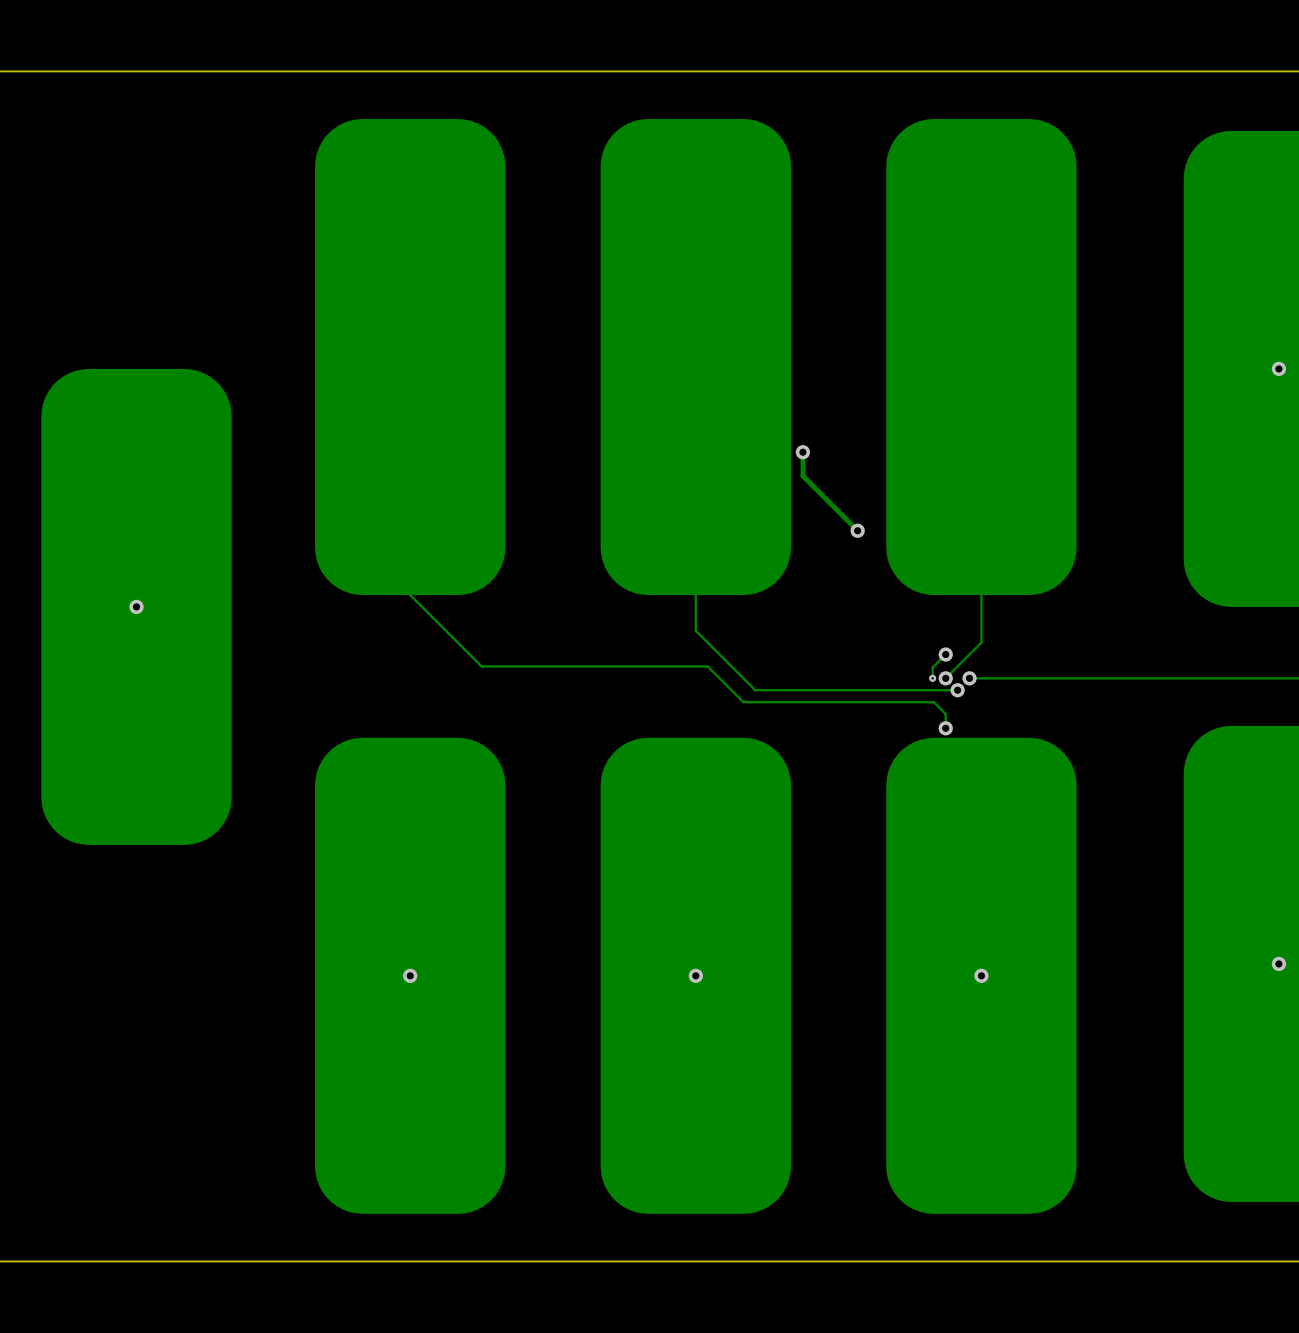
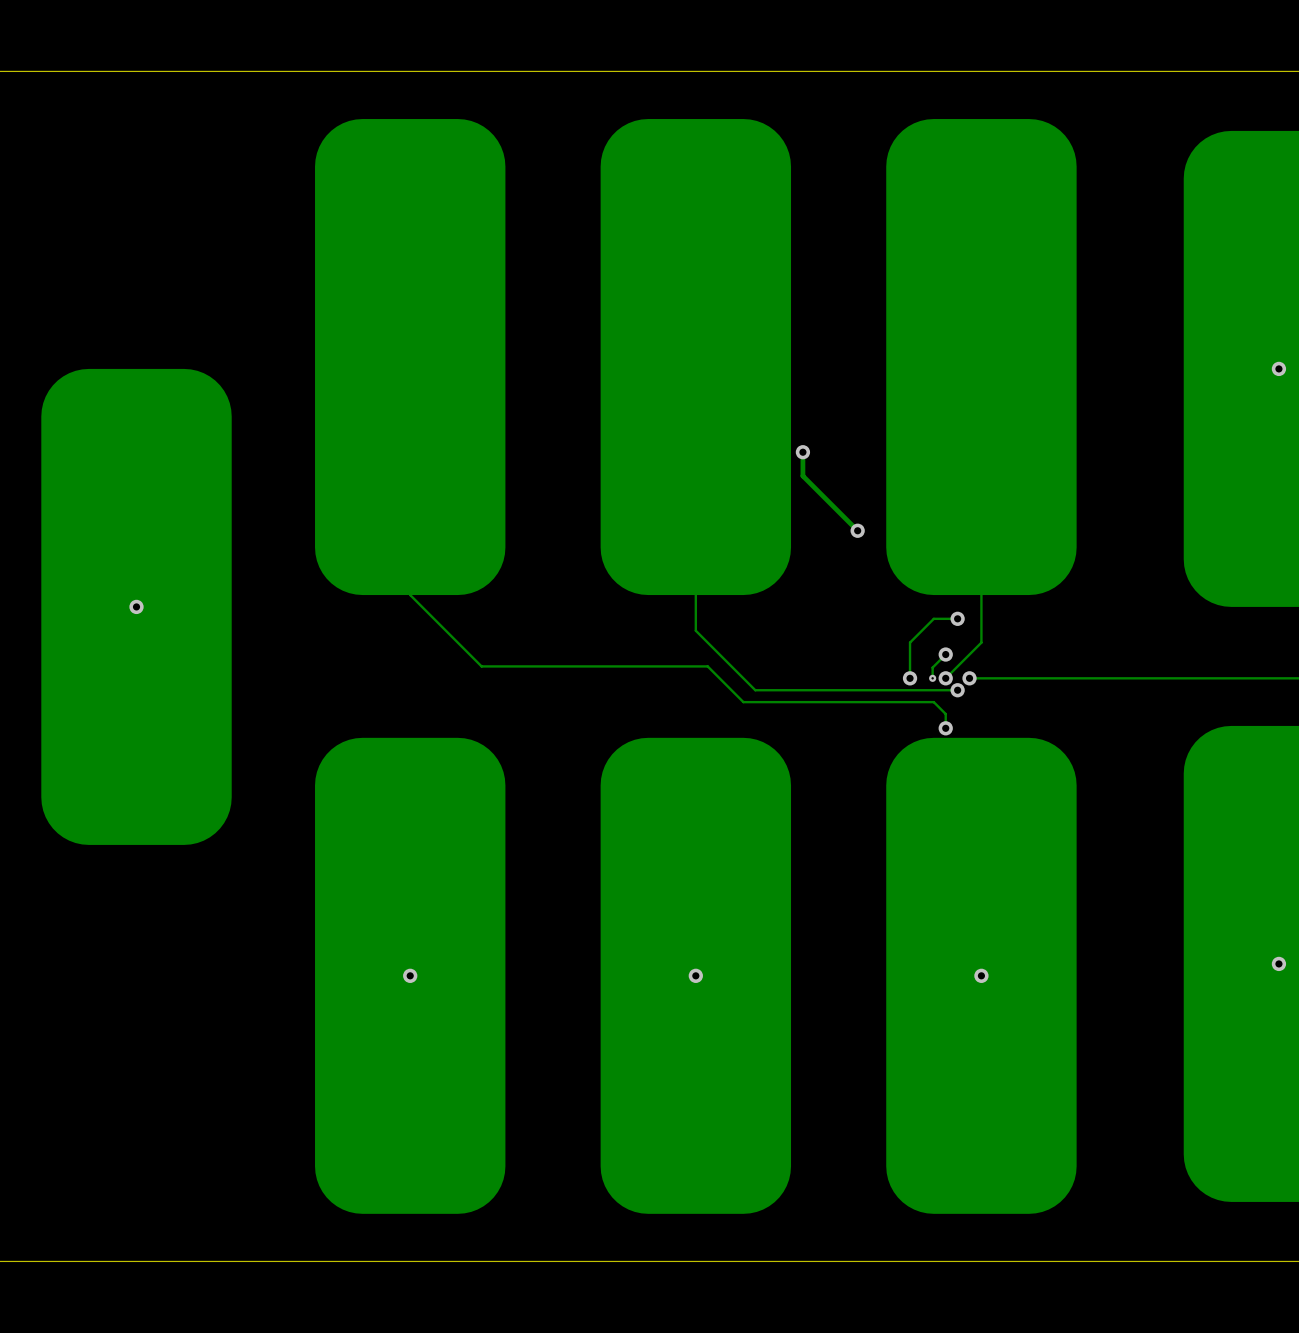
track: none -> (957, 618) (933, 618) (910, 642) (910, 678)
via: none -> (957, 618)
via: none -> (910, 678)

